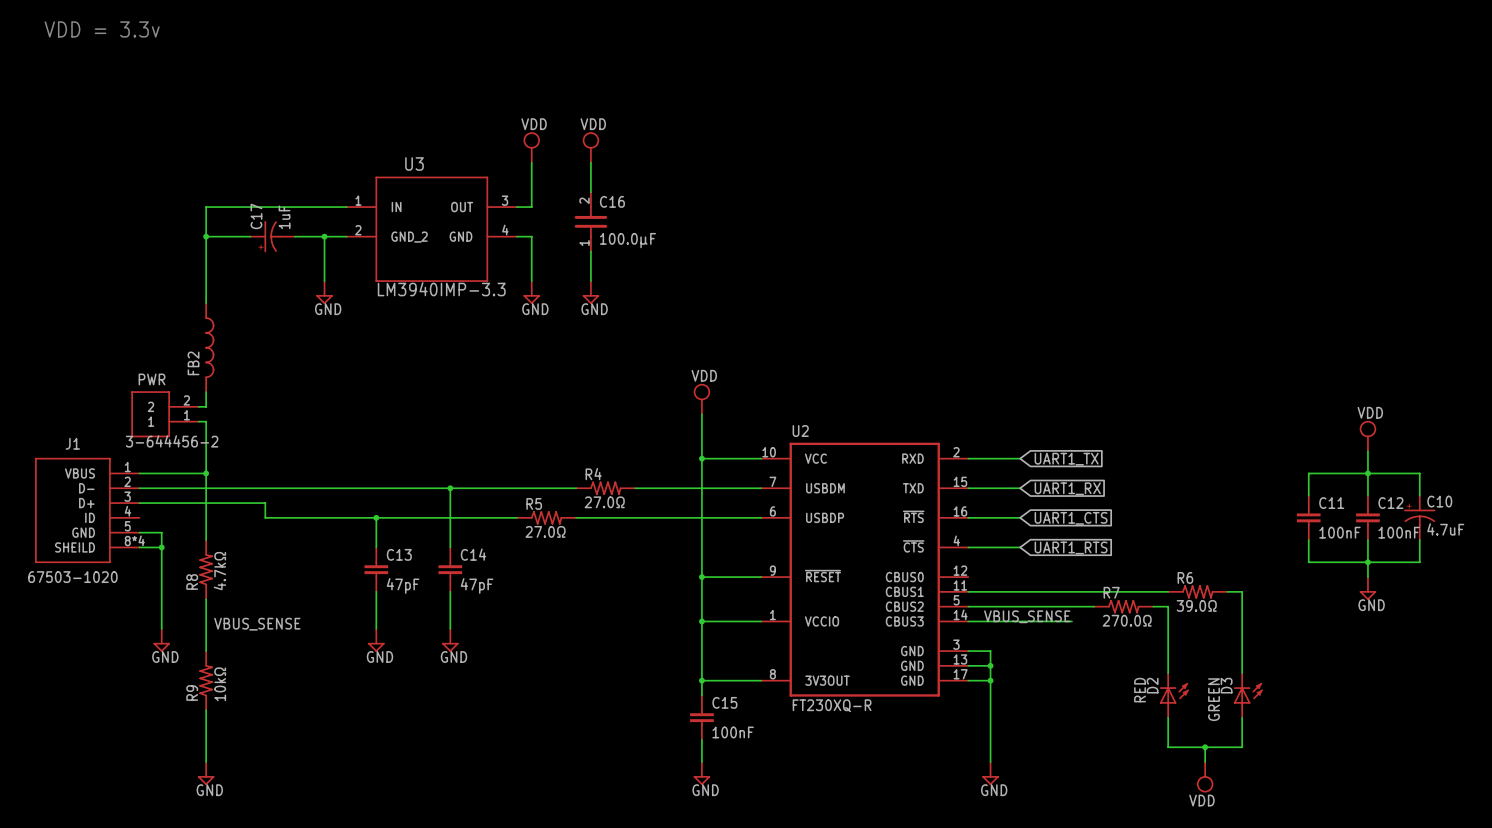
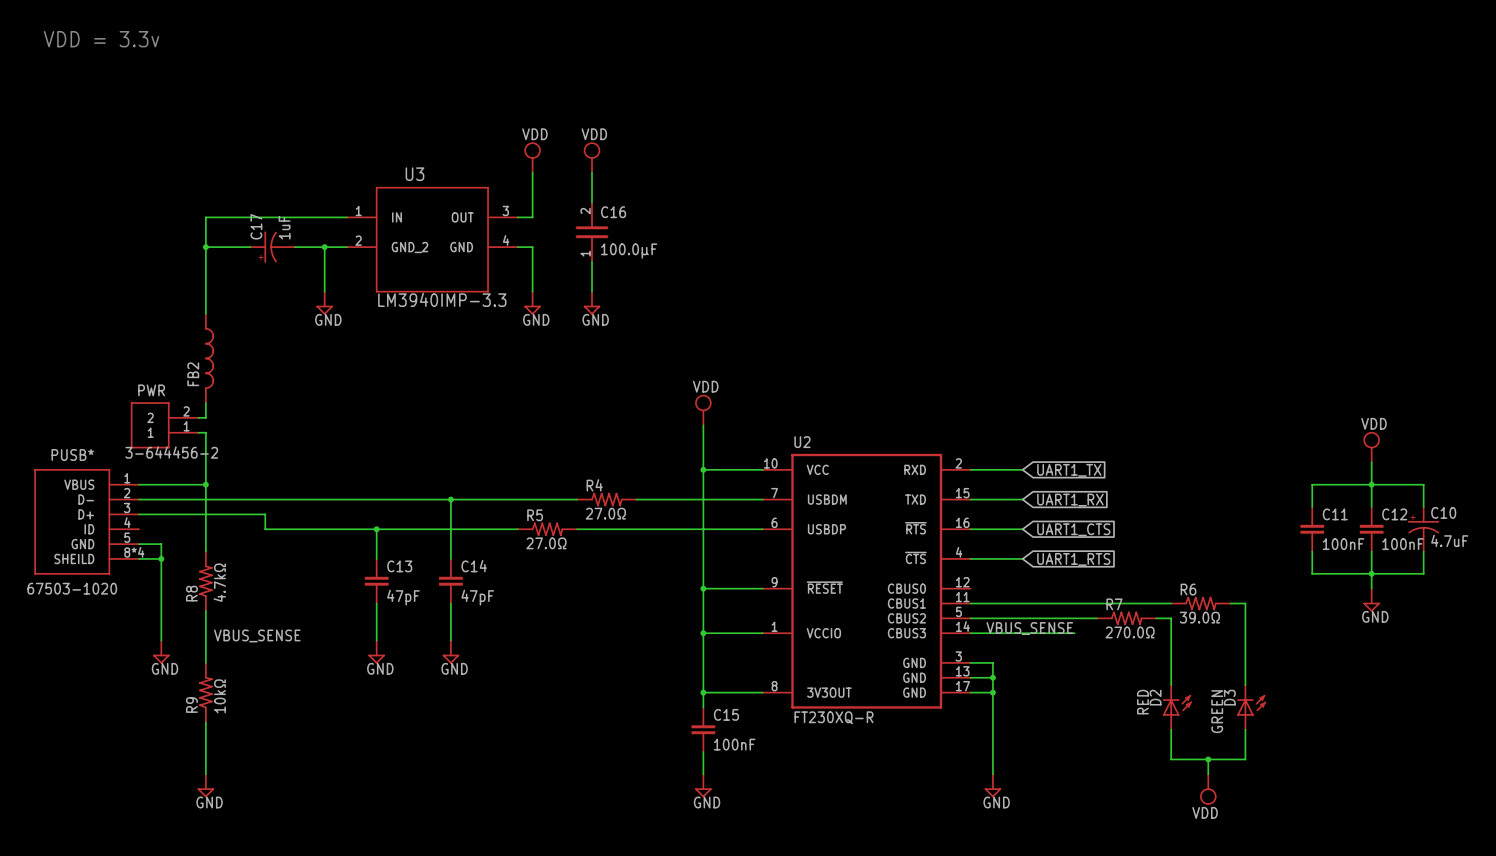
J1 name: J1 (72, 443) -> PUSB* (72, 454)

